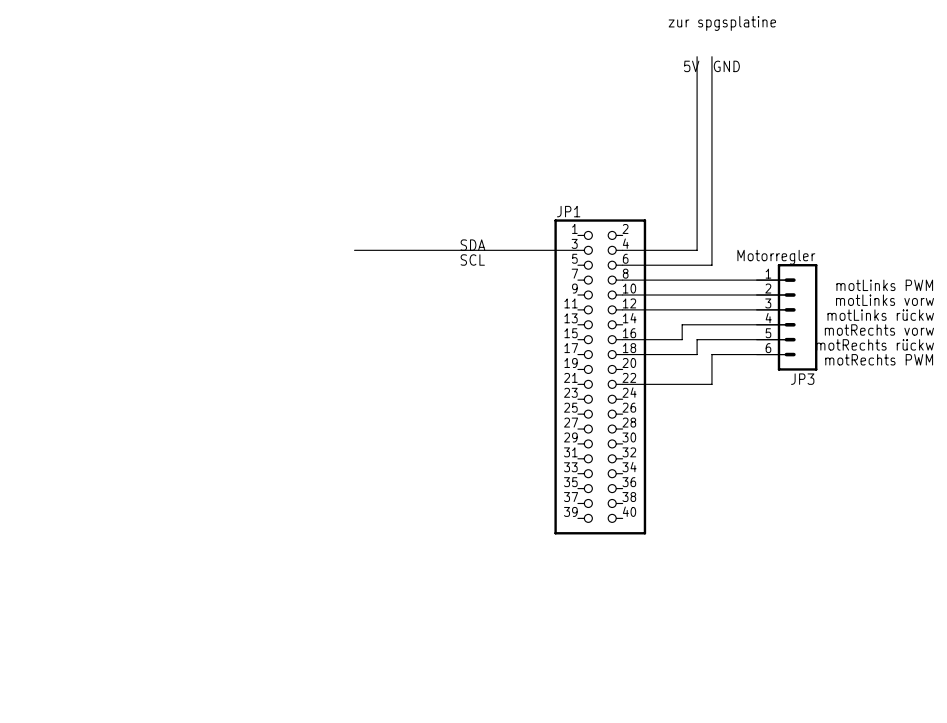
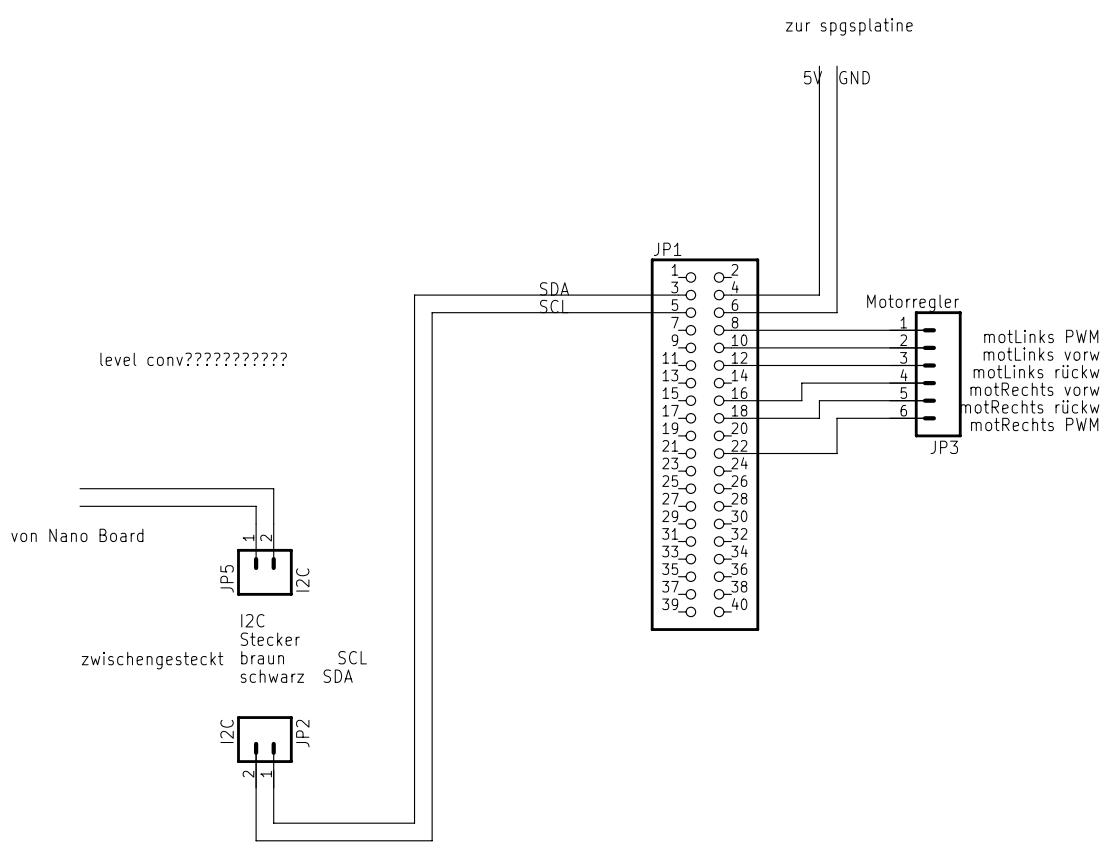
wire: none -> (414, 295) (414, 823) (273, 823) (273, 770)
wire: none -> (678, 312) (432, 312) (432, 840) (256, 840) (256, 752)
text: none -> level conv??????????? (193, 359)
wire: none -> (80, 488) (273, 488) (273, 523)
wire: none -> (80, 506) (256, 506) (256, 523)
text: none -> von Nano Board (77, 535)
JP5: none -> I2C (264, 559)
text: none -> I2C (252, 620)
text: none -> Stecker (270, 639)
text: none -> braun SCL (304, 657)
text: none -> zwischengesteckt (152, 660)
text: none -> schwarz SDA (296, 676)
JP2: none -> I2C (264, 752)

